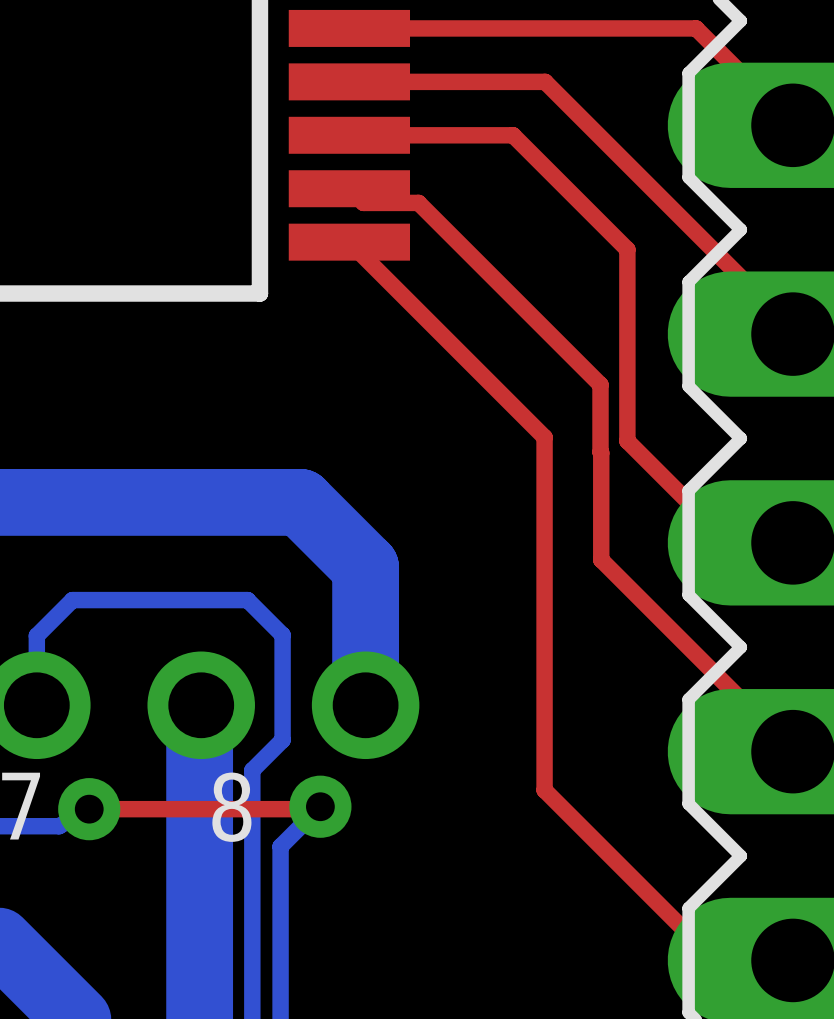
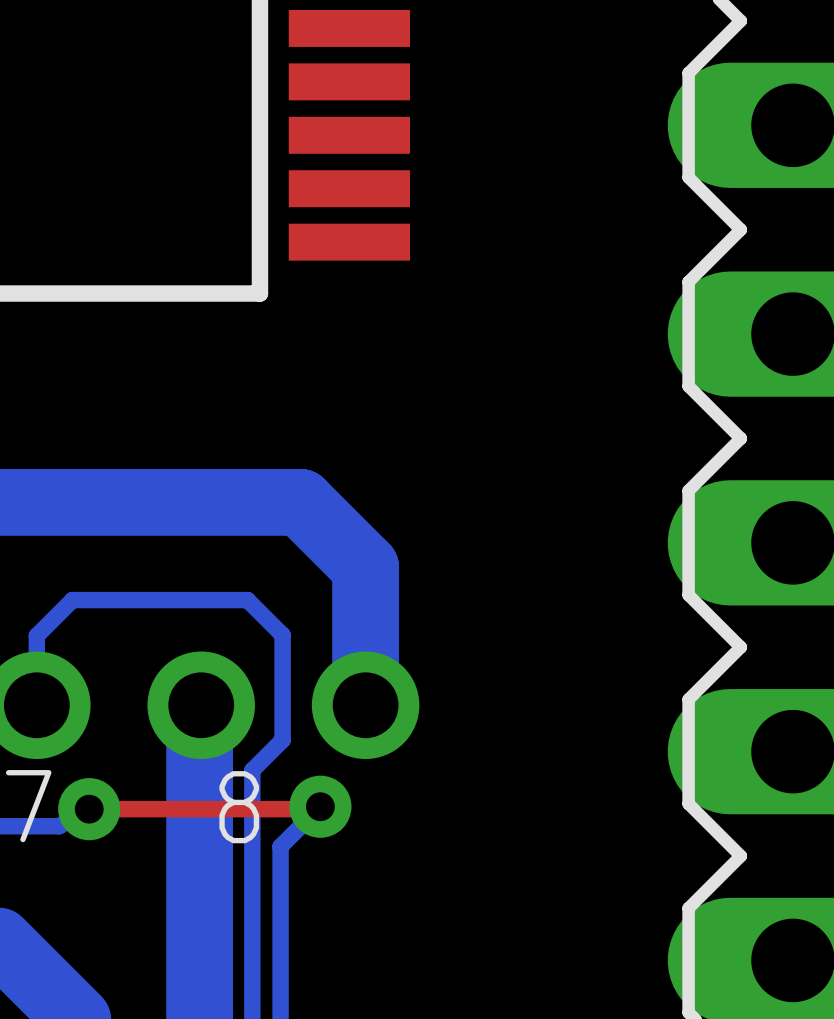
top track: (349, 28) (696, 28) (793, 125) -> none
top track: (349, 81) (545, 81) (793, 329) (793, 334) -> none
top track: (349, 135) (513, 135) (627, 249) (627, 441) (729, 542) (793, 542) -> none
top track: (349, 188) (363, 202) (418, 202) (600, 384) (600, 452) -> none
top track: (349, 242) (544, 437) (544, 790) (714, 960) (793, 960) -> none
top track: (601, 452) (601, 559) (793, 751) -> none

